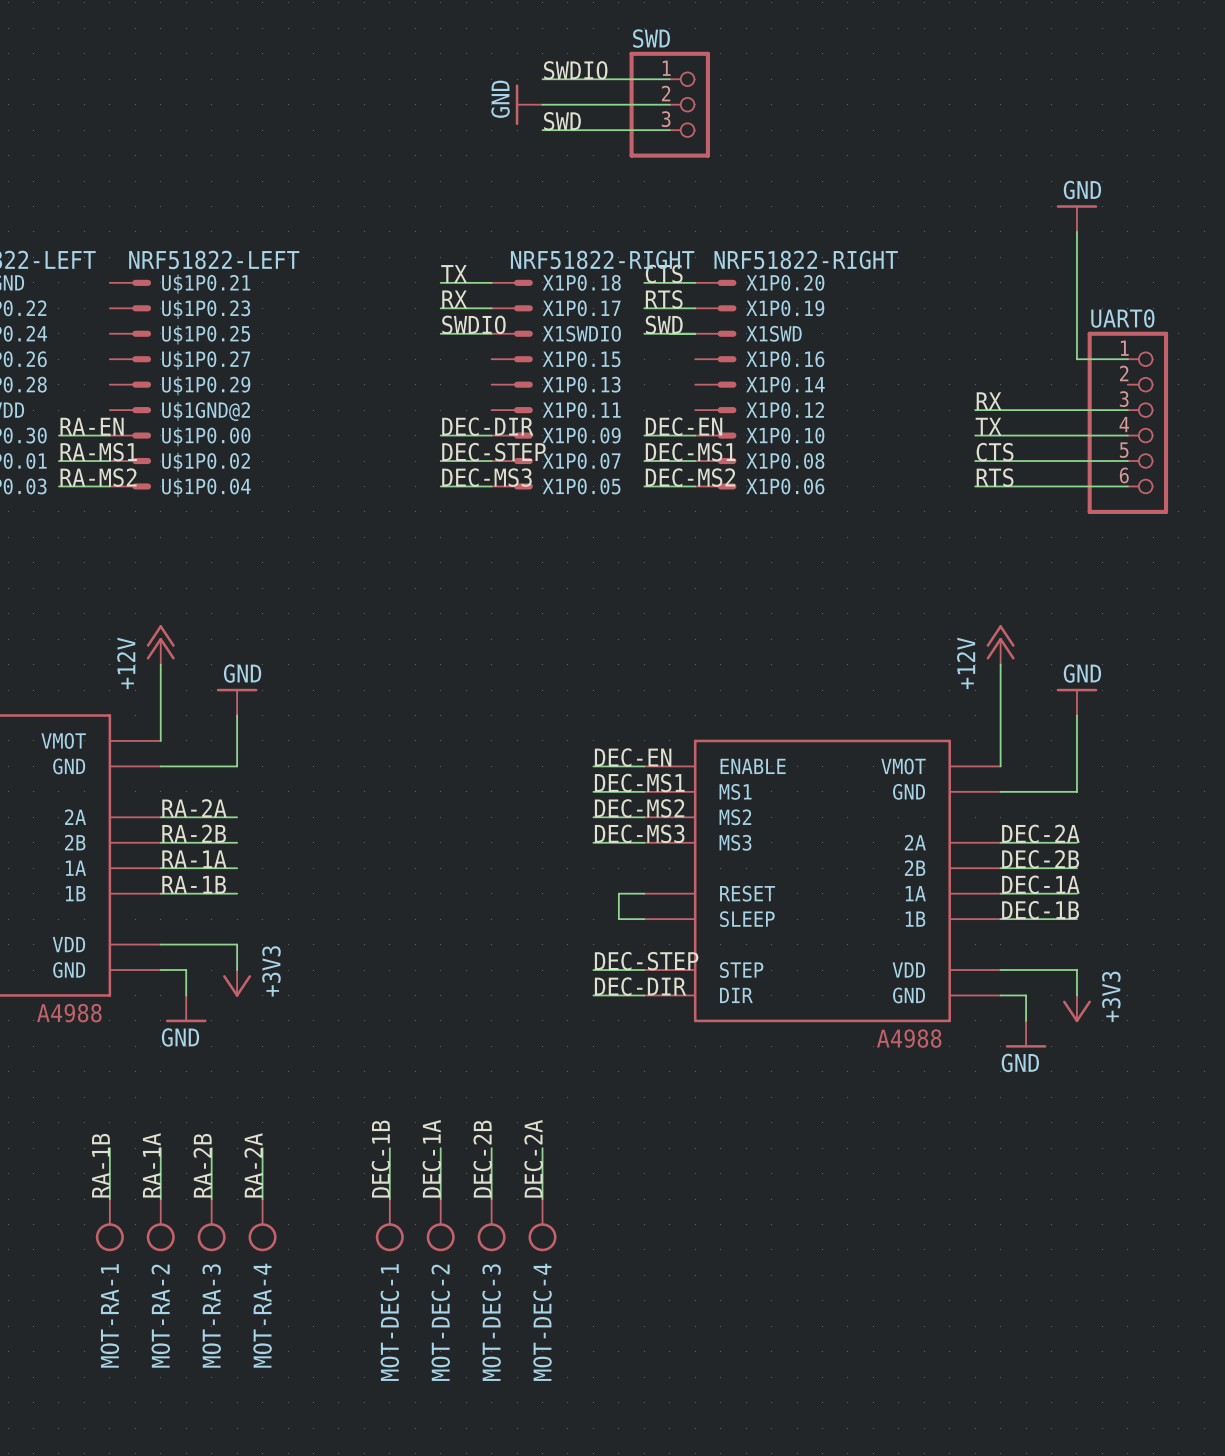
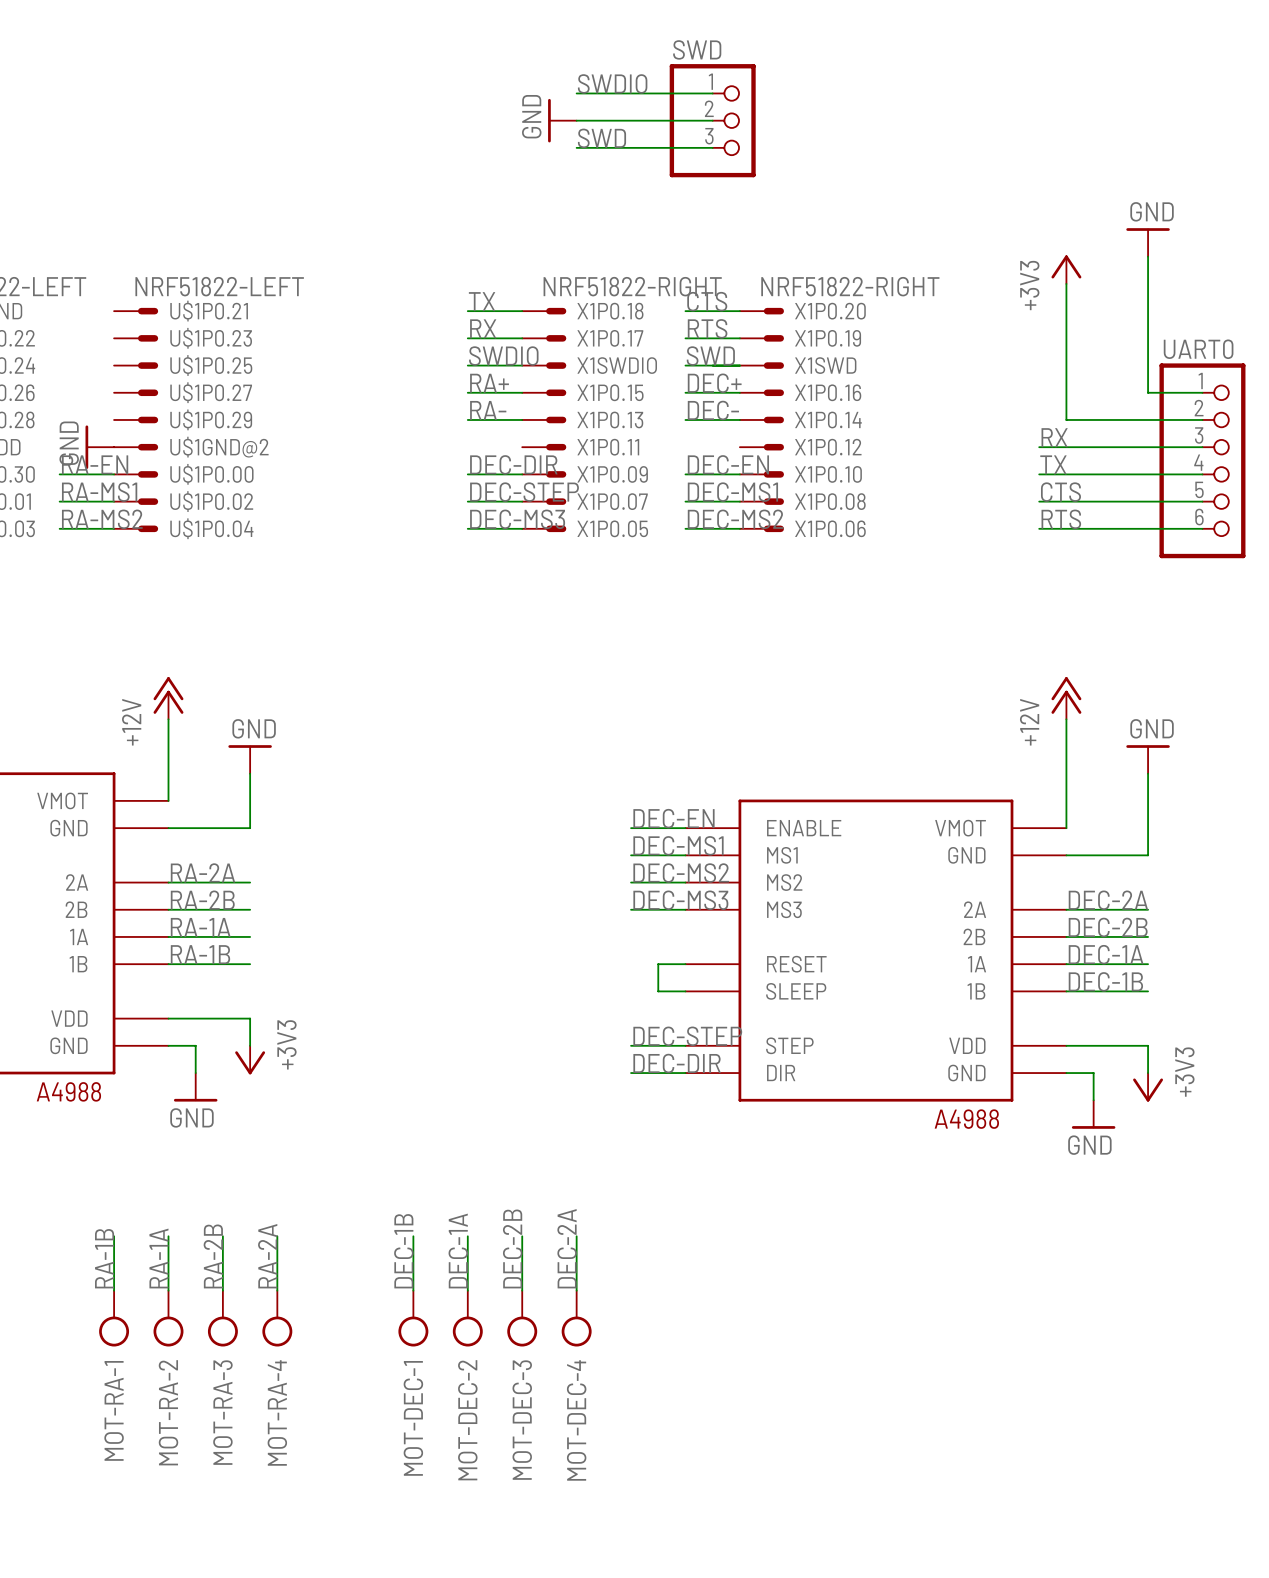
power symbol: none -> +3V3 (1066, 269)
wire: none -> (1066, 283) (1066, 419) (1202, 419)
label: none -> RA+ (489, 383)
label: none -> DEC+ (714, 383)
wire: none -> (467, 392) (522, 392)
wire: none -> (685, 392) (739, 392)
label: none -> RA- (488, 410)
label: none -> DEC- (713, 410)
wire: none -> (467, 419) (522, 419)
wire: none -> (685, 419) (739, 419)
power symbol: none -> GND (99, 447)

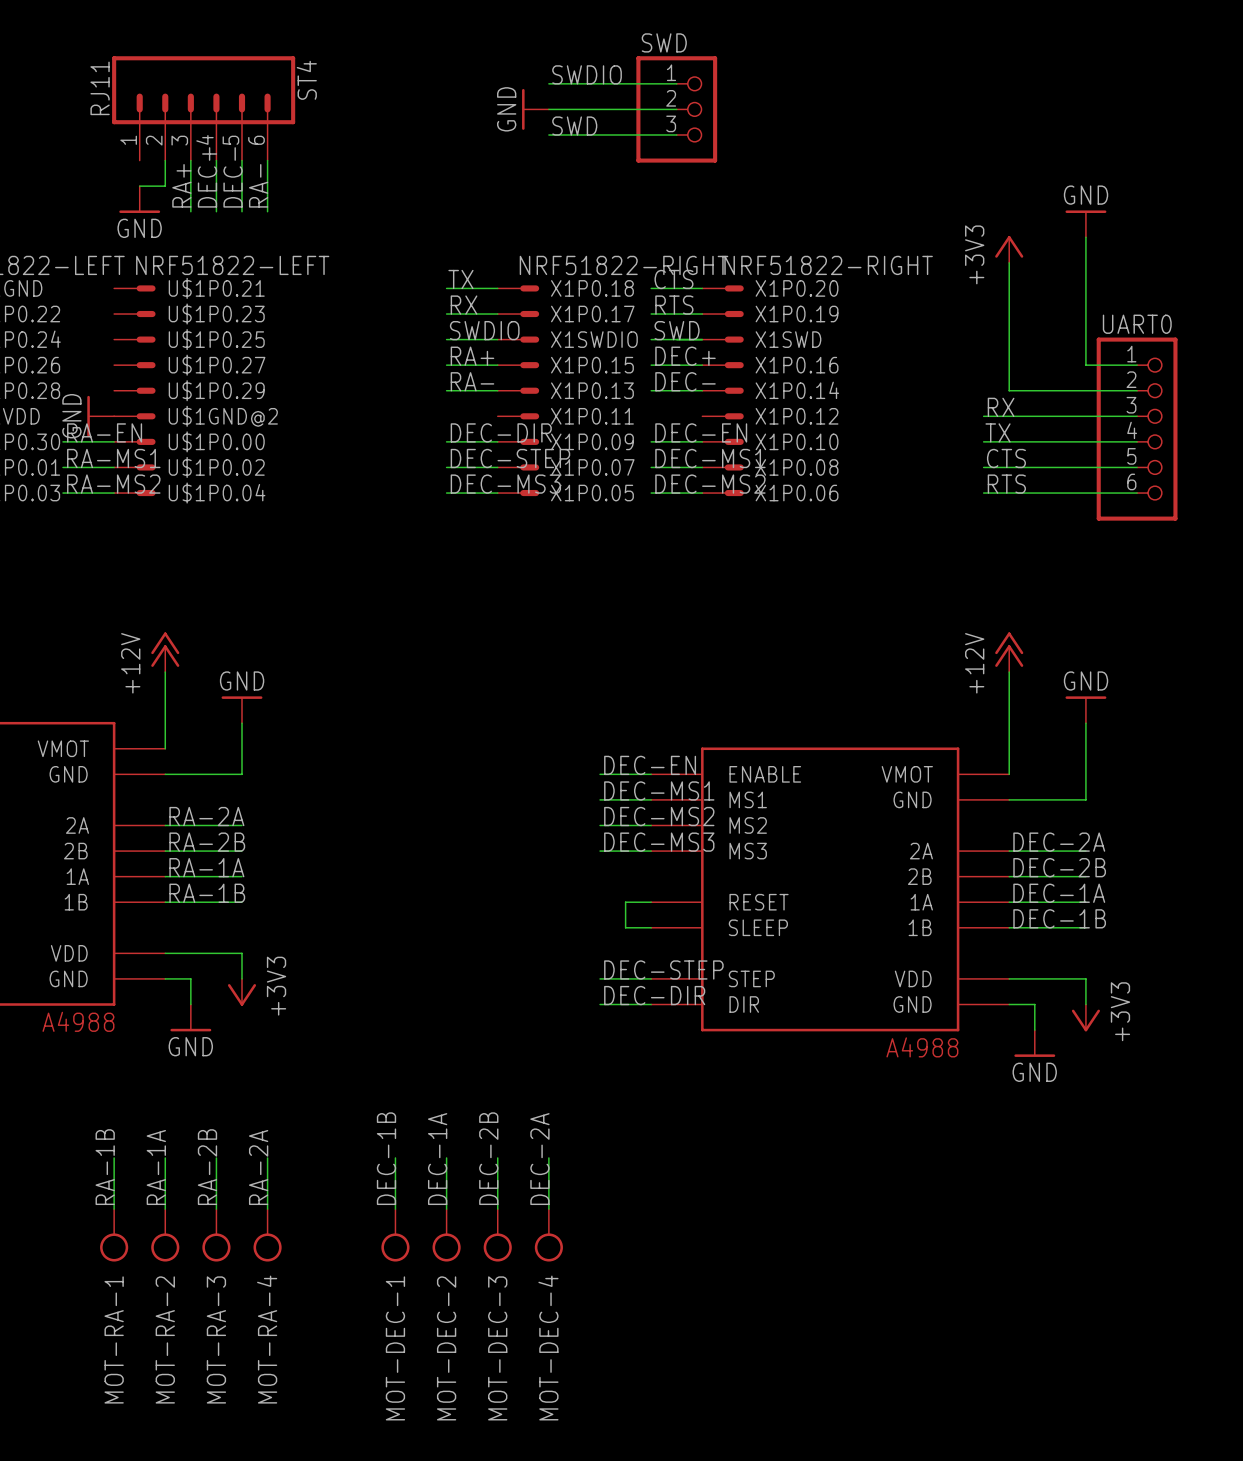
ST4: none -> RJ11 (203, 108)
wire: none -> (165, 160) (165, 186) (139, 186)
wire: none -> (190, 160) (190, 211)
wire: none -> (216, 160) (216, 211)
wire: none -> (242, 160) (242, 211)
wire: none -> (267, 160) (267, 211)
label: none -> DEC+ (207, 177)
label: none -> DEC- (233, 177)
label: none -> RA+ (181, 185)
label: none -> RA- (258, 185)
power symbol: none -> GND (139, 199)

